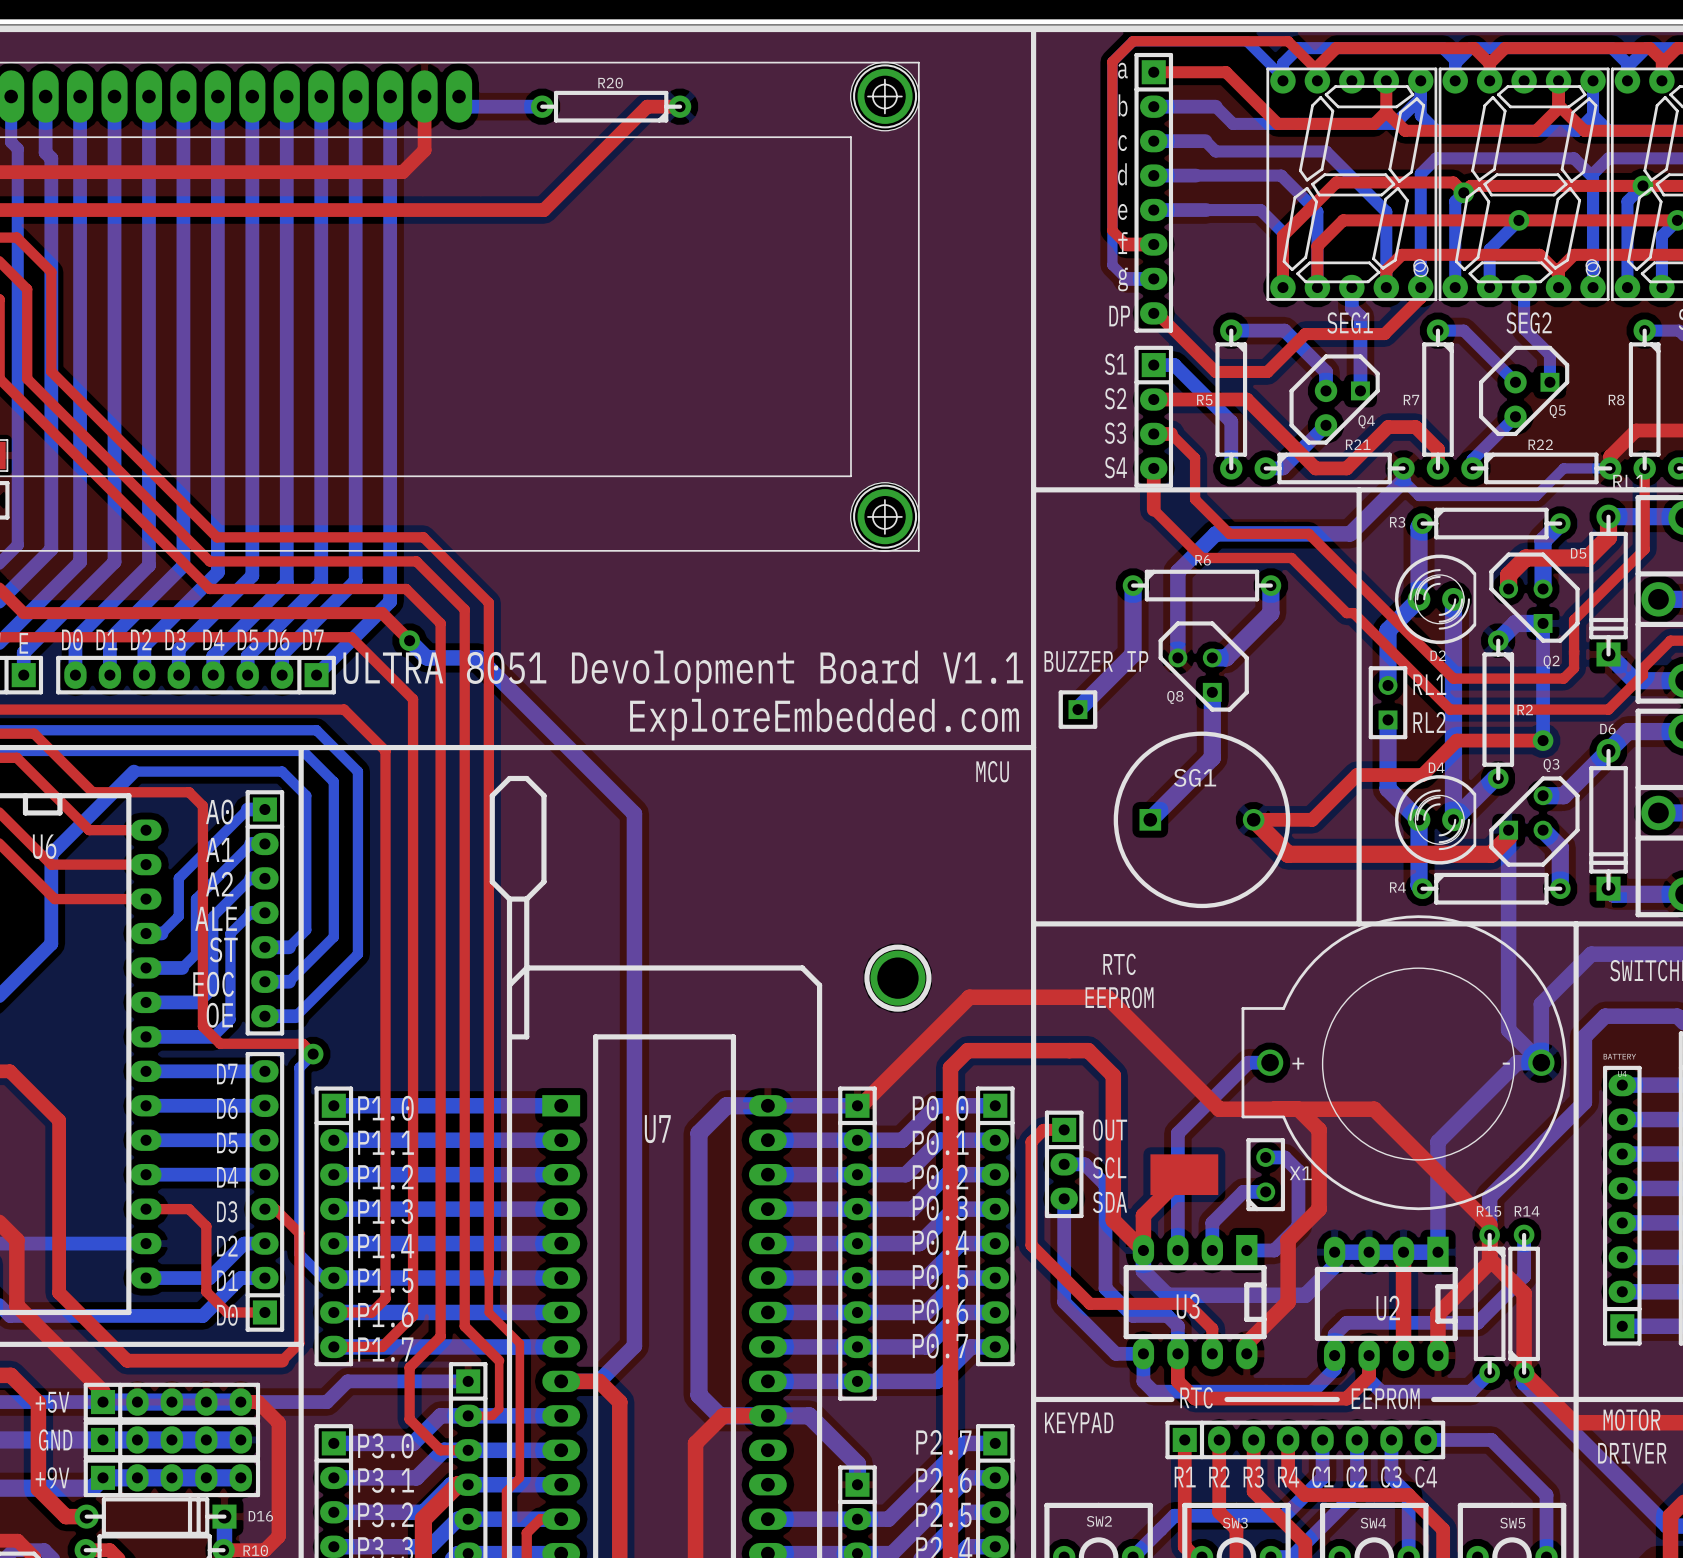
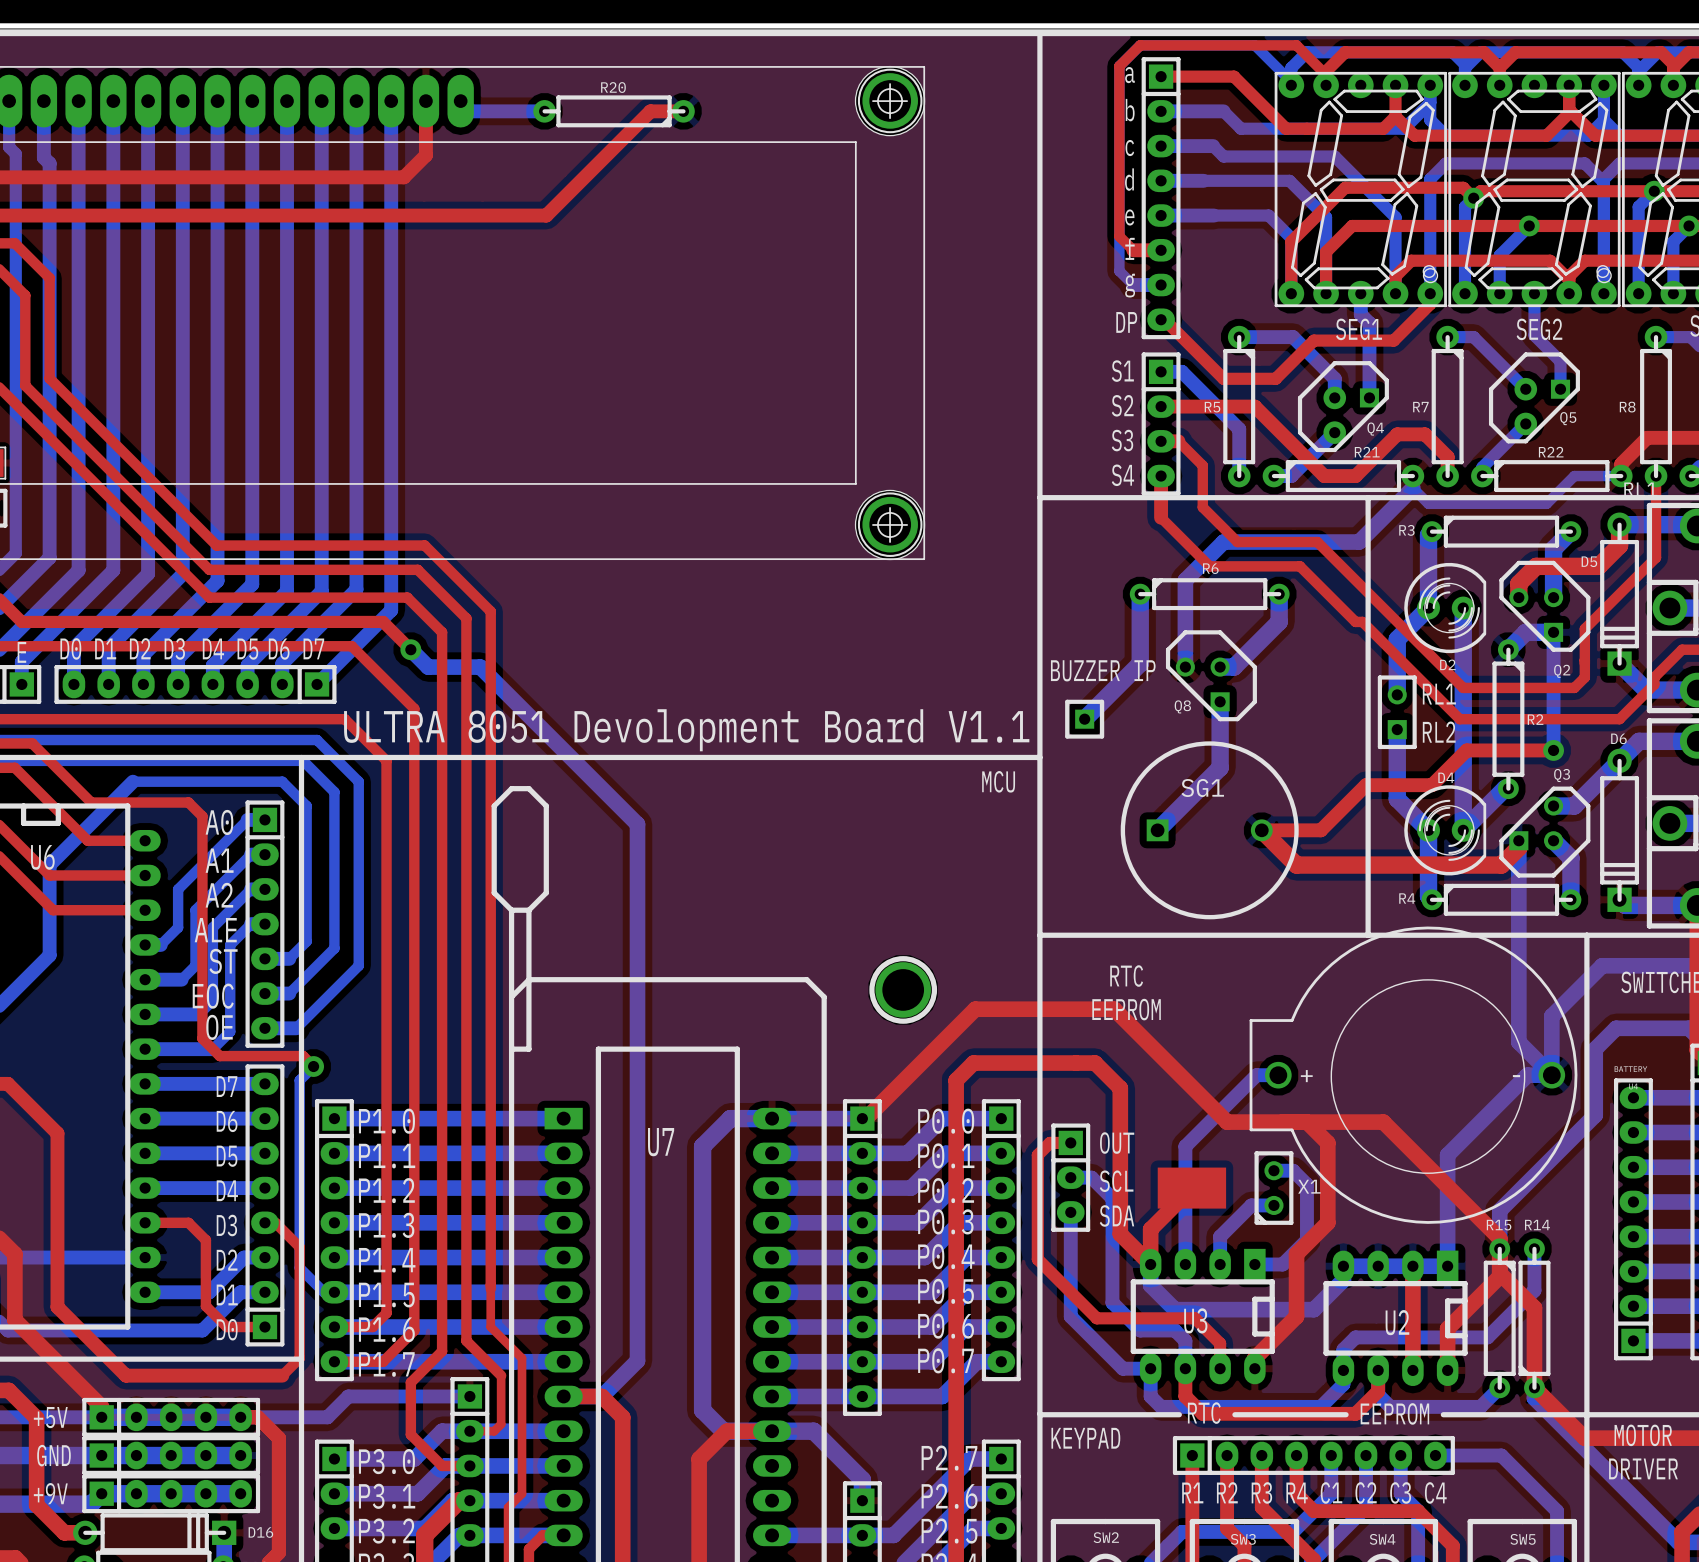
text position: ULTRA 8051 Devolopment Board V1.1 (683, 671) -> ULTRA 8051 Devolopment Board V1.1 (686, 730)
text: ExploreEmbedded.com (824, 719) -> none

